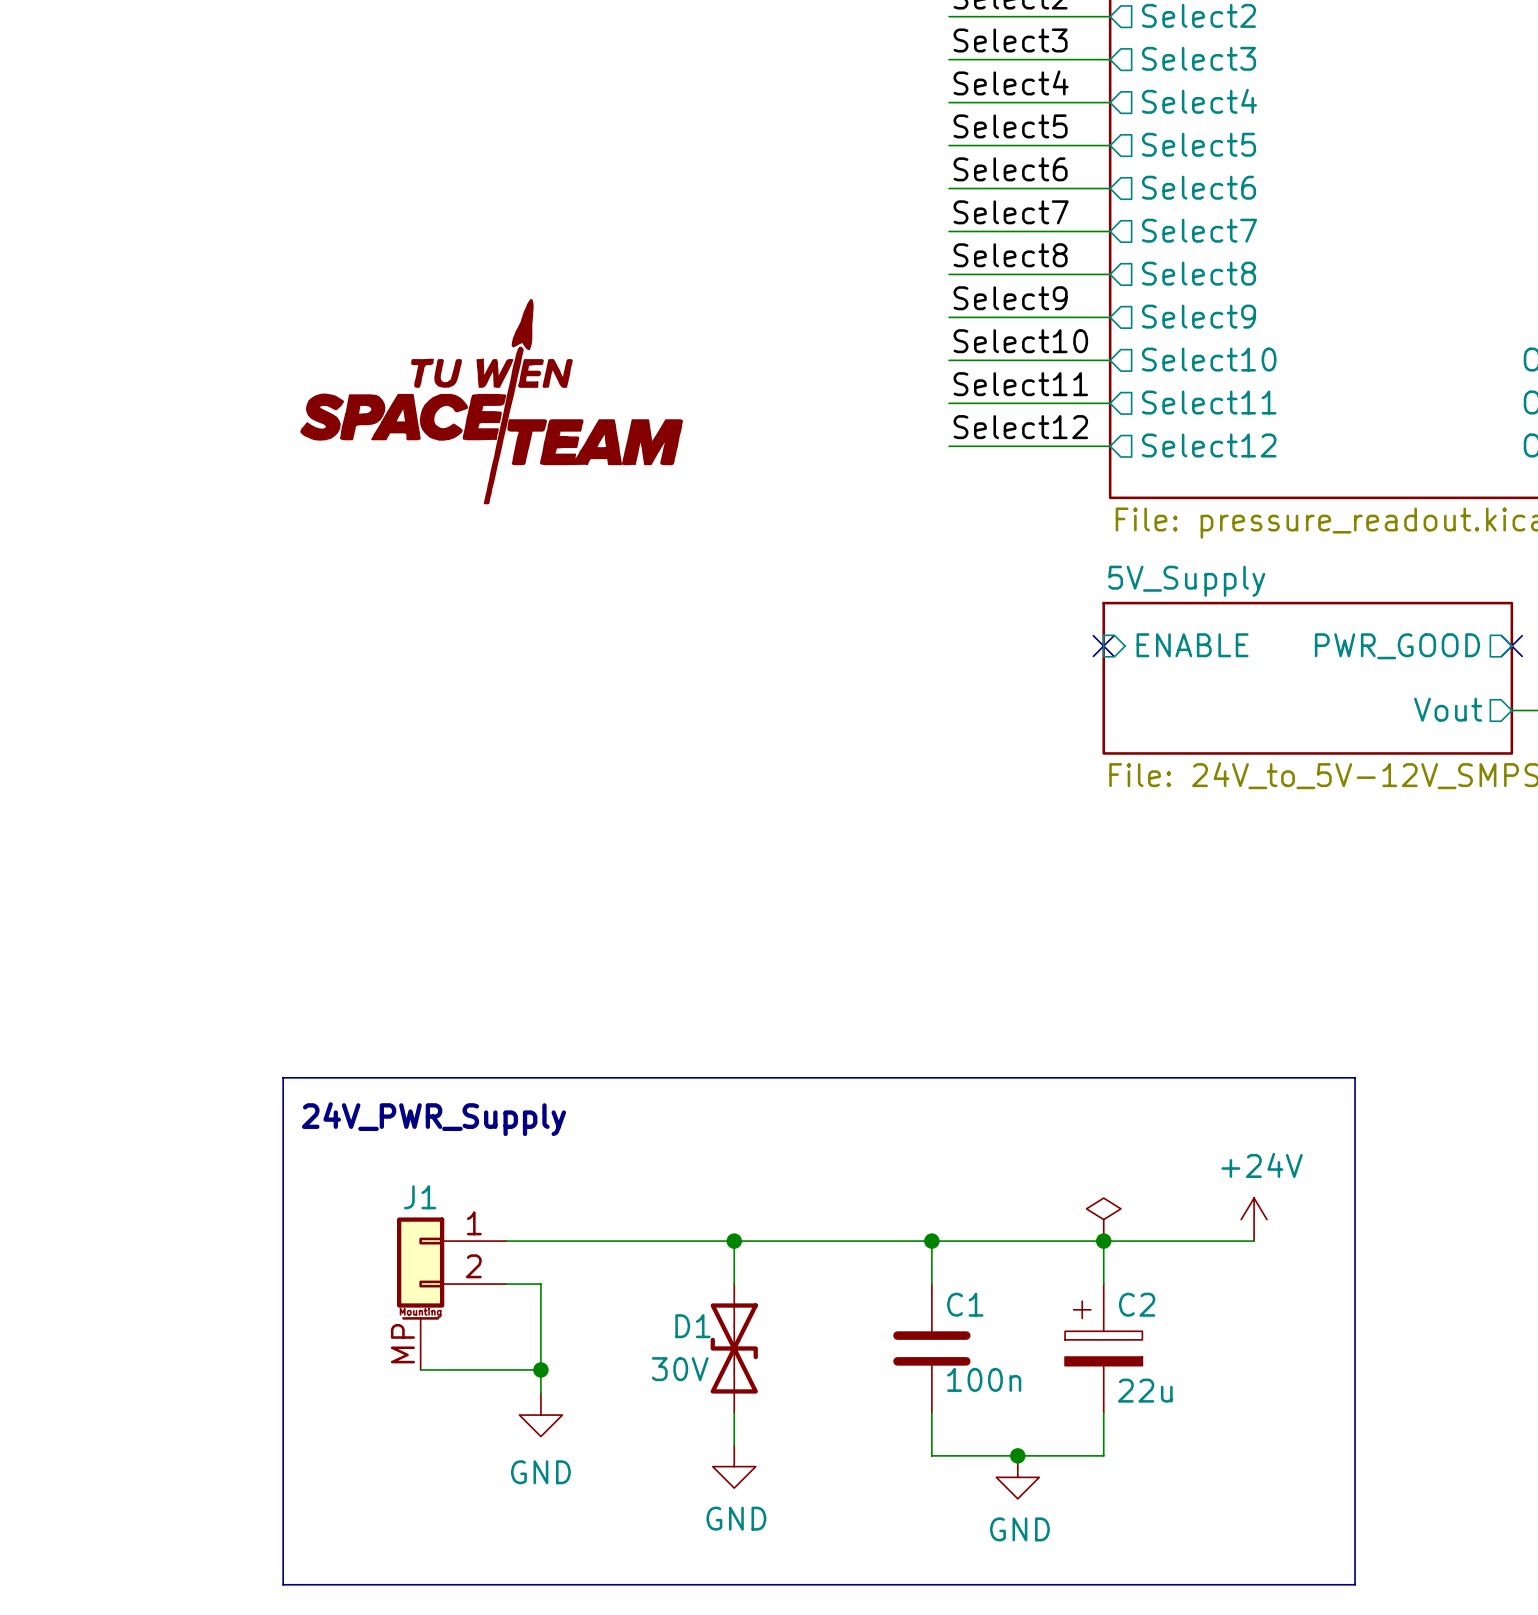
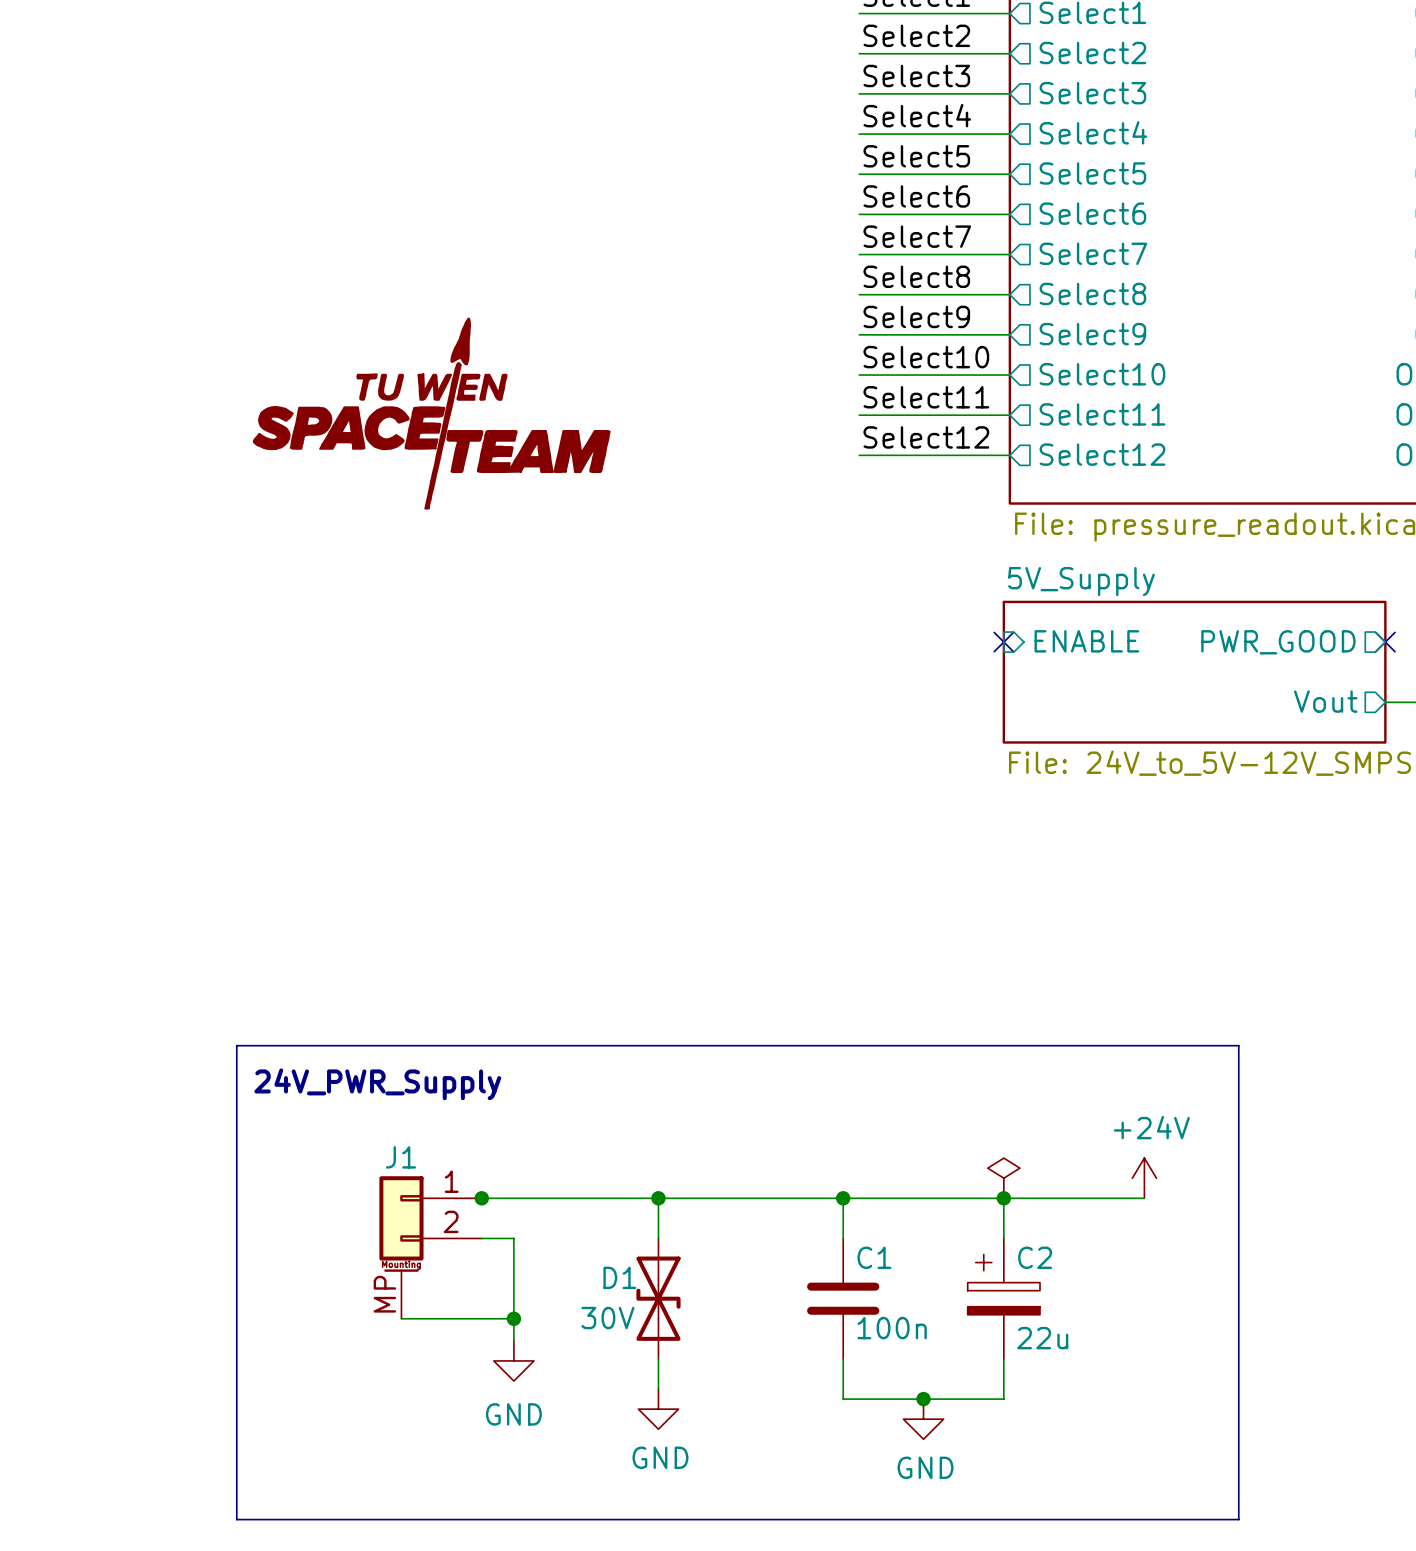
junction: none -> (481, 1198)
wire: (506, 1284) (540, 1284) (540, 1393) -> (481, 1238) (513, 1238) (513, 1340)
J1 position: (451, 1293) -> (430, 1247)
wire: (420, 1369) (459, 1369) -> (477, 1318) (513, 1318)
junction position: (540, 1369) -> (513, 1318)
power symbol position: GND (540, 1415) -> GND (513, 1360)

